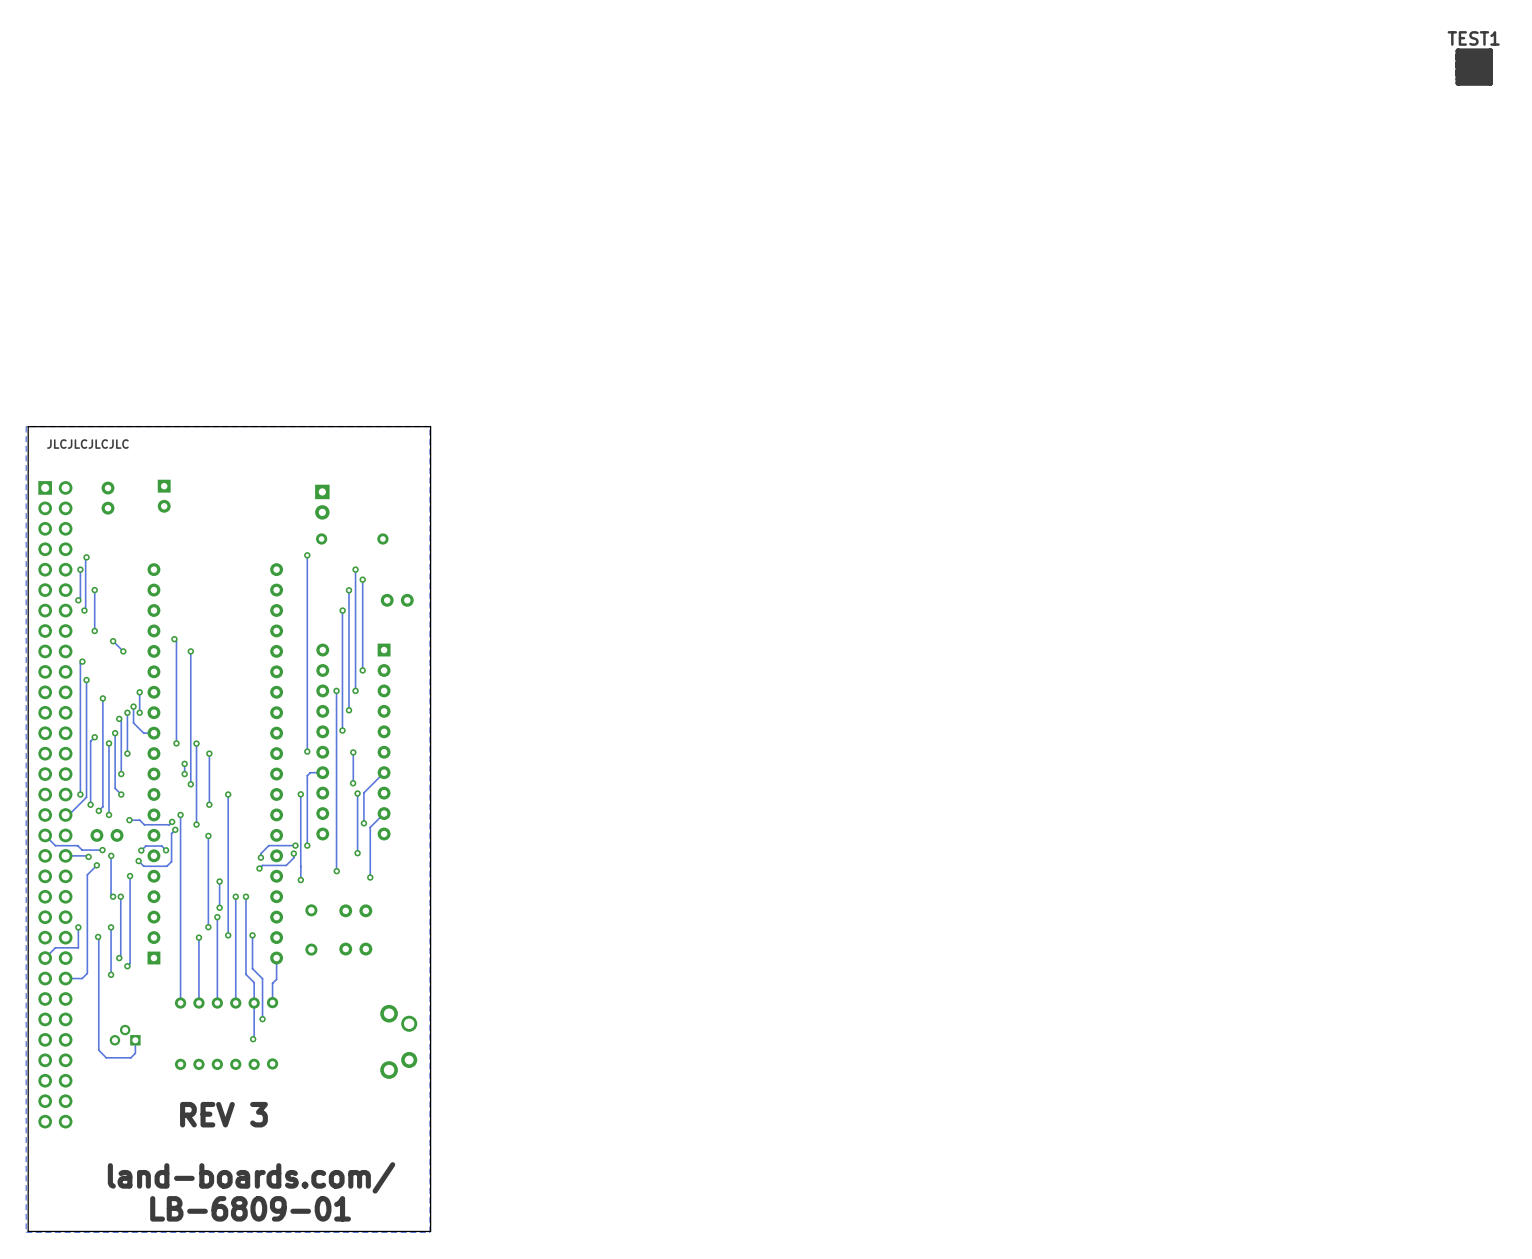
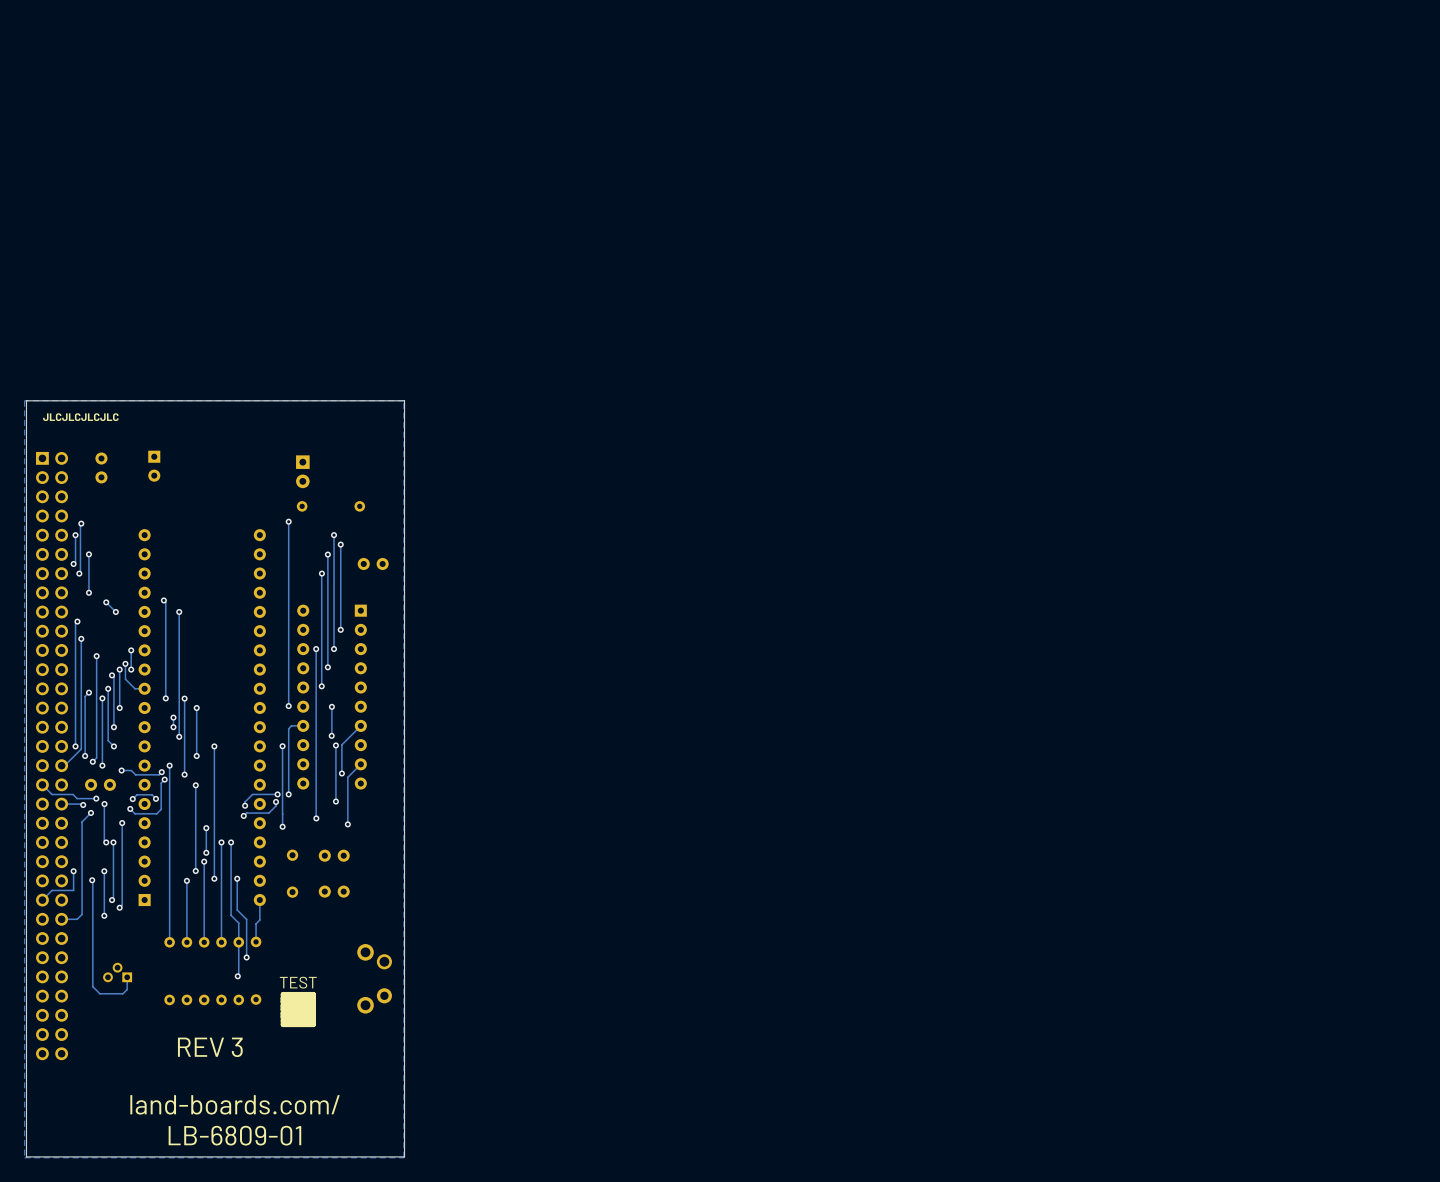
TEST1: (1474, 67) -> none
TEST: none -> (298, 1009)

